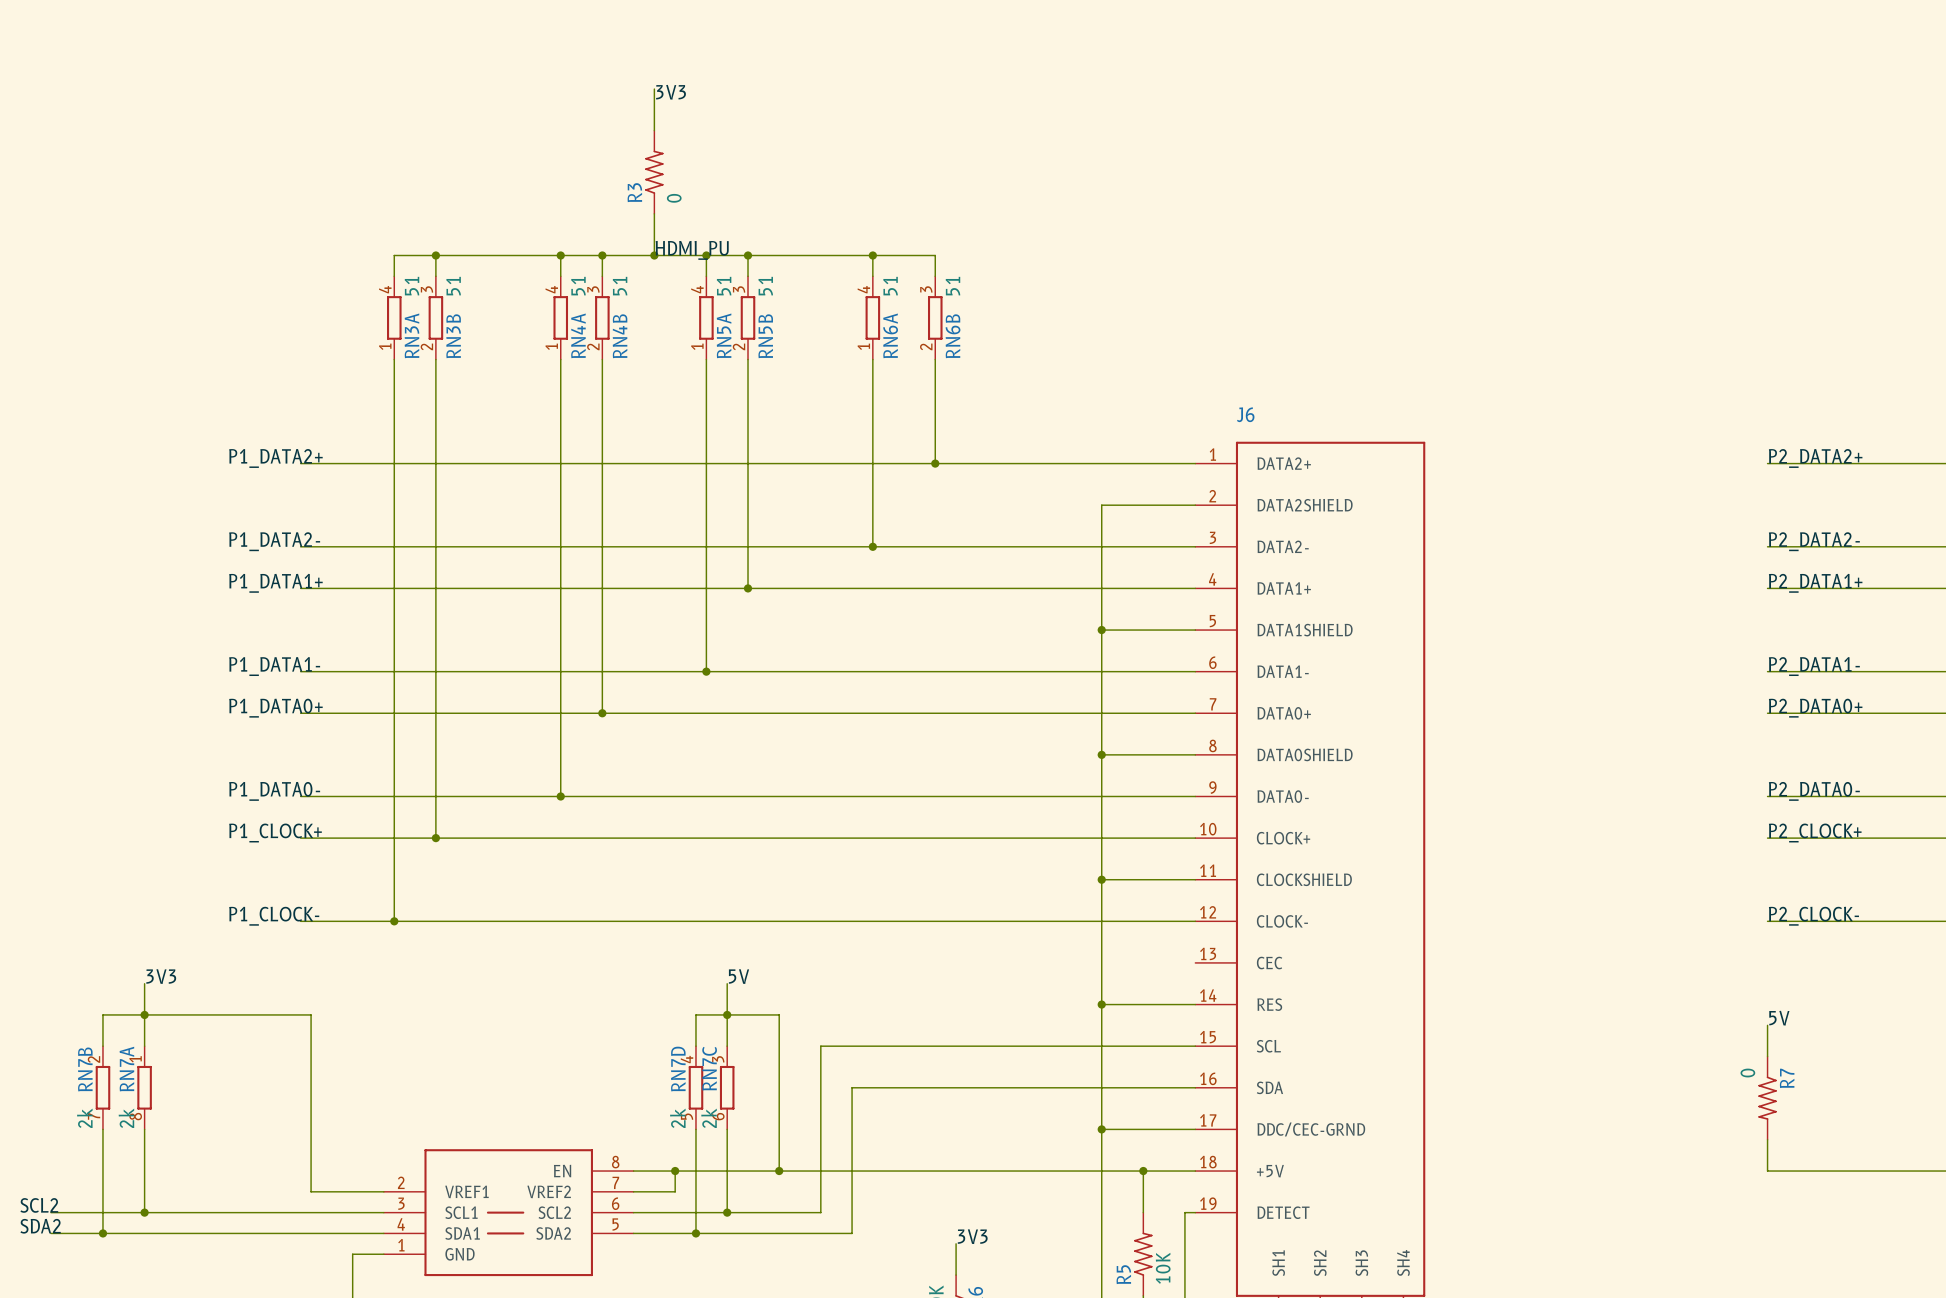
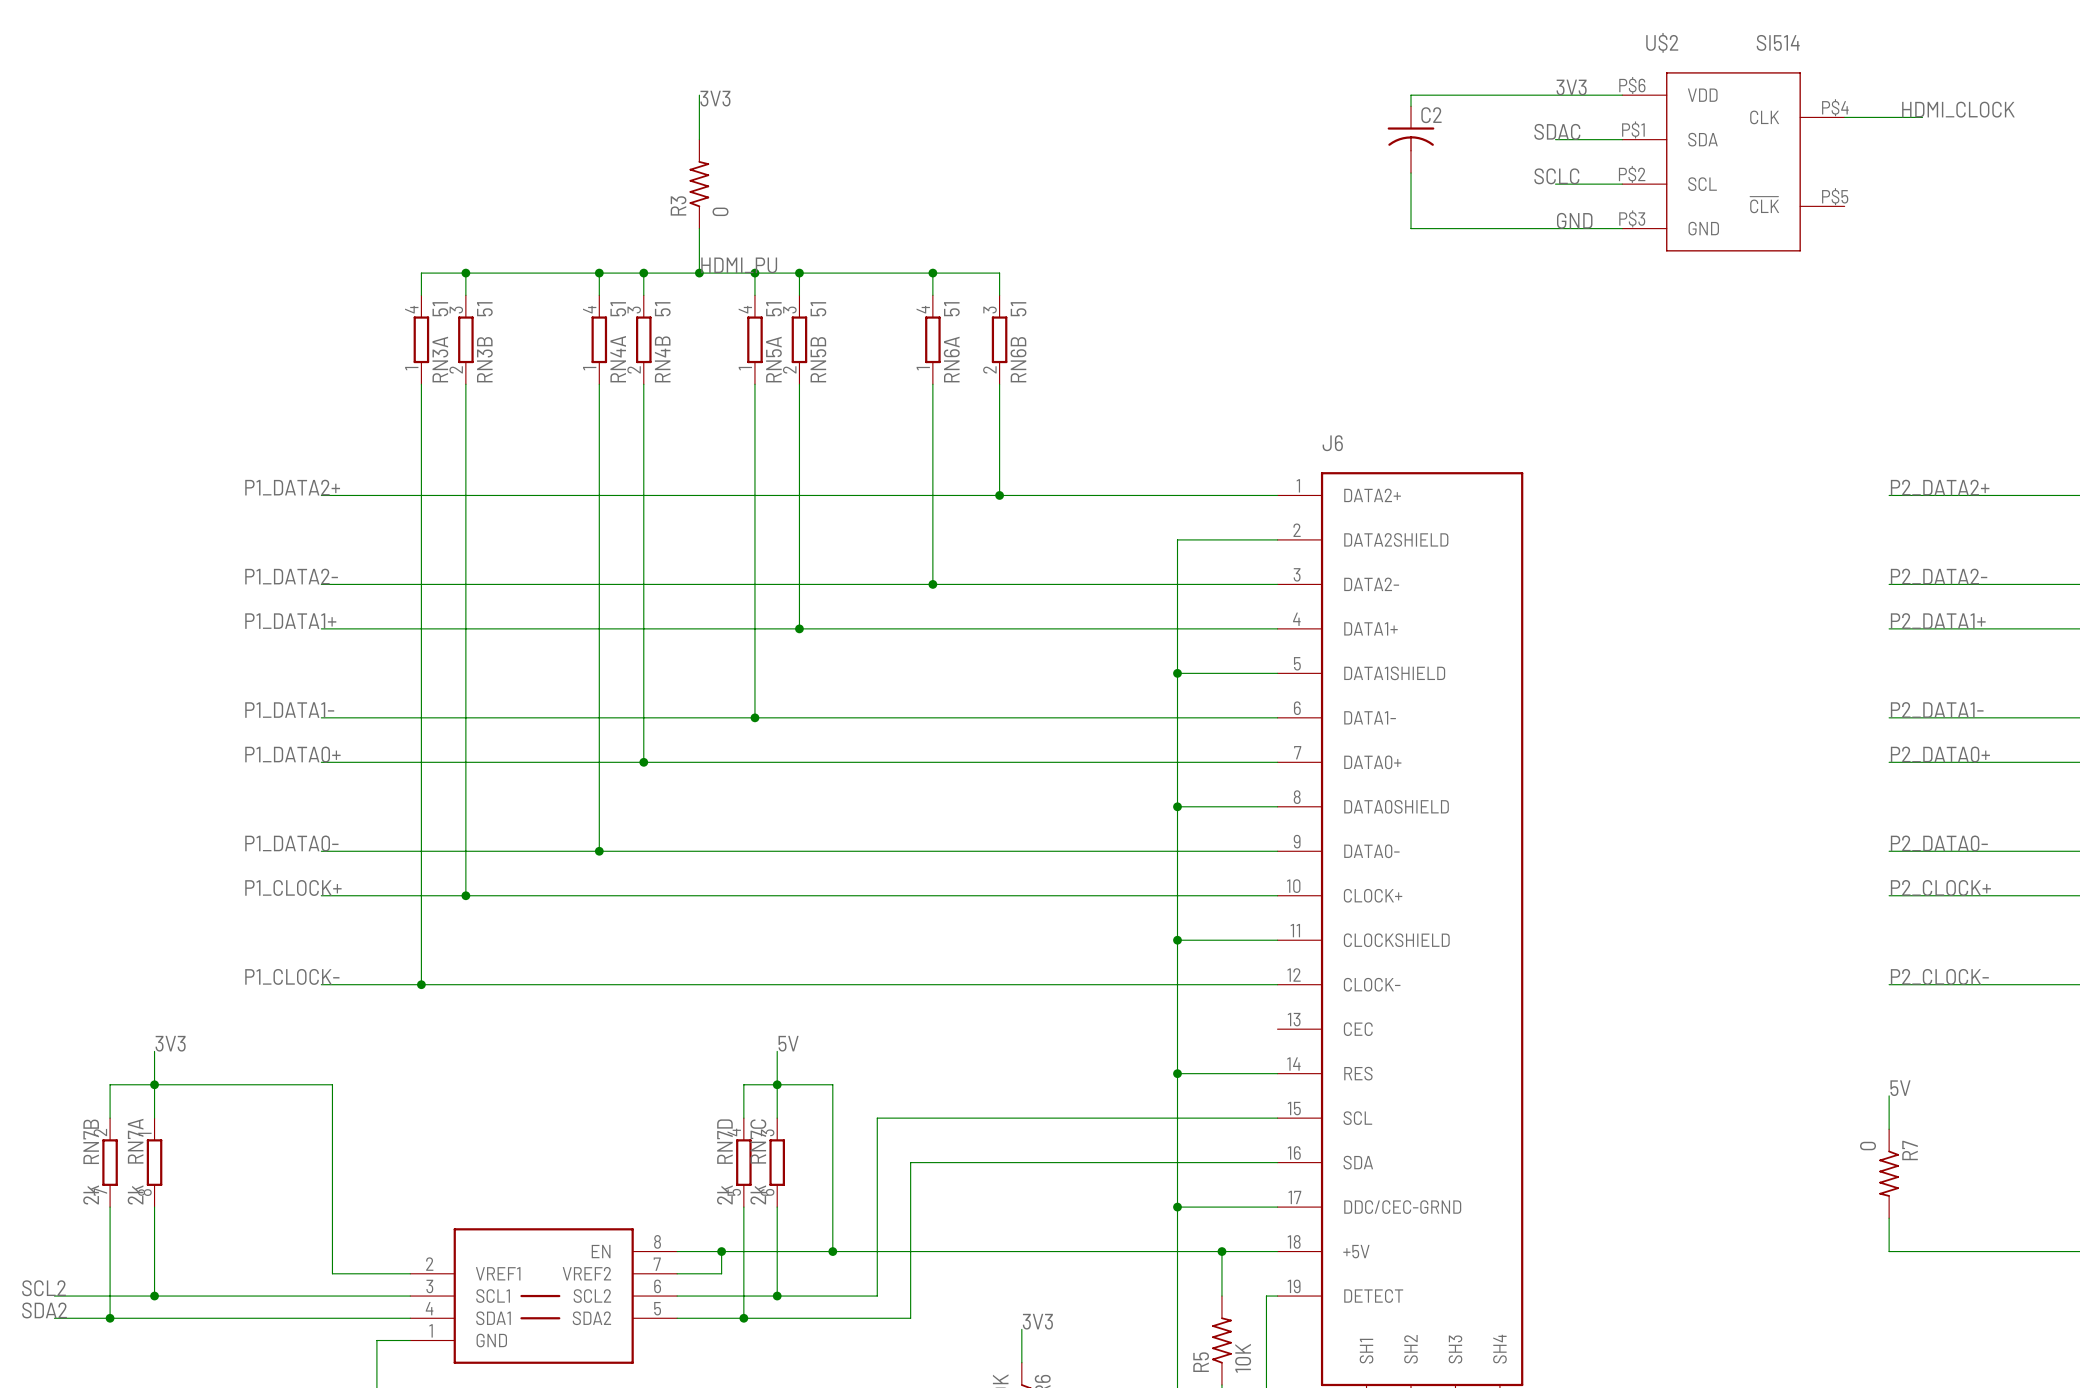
label: none -> 3V3 (1571, 87)
wire: none -> (1622, 95) (1411, 95) (1411, 106)
label: none -> HDMI_CLOCK (1958, 109)
wire: none -> (1844, 117) (1922, 117)
label: none -> SDAC (1557, 131)
C2: none -> (1411, 139)
wire: none -> (1555, 139) (1622, 139)
U$2: none -> SI514 (1733, 161)
wire: none -> (1411, 173) (1411, 228) (1622, 228)
label: none -> SCLC (1556, 176)
wire: none -> (1555, 184) (1622, 184)
label: none -> GND (1574, 220)

